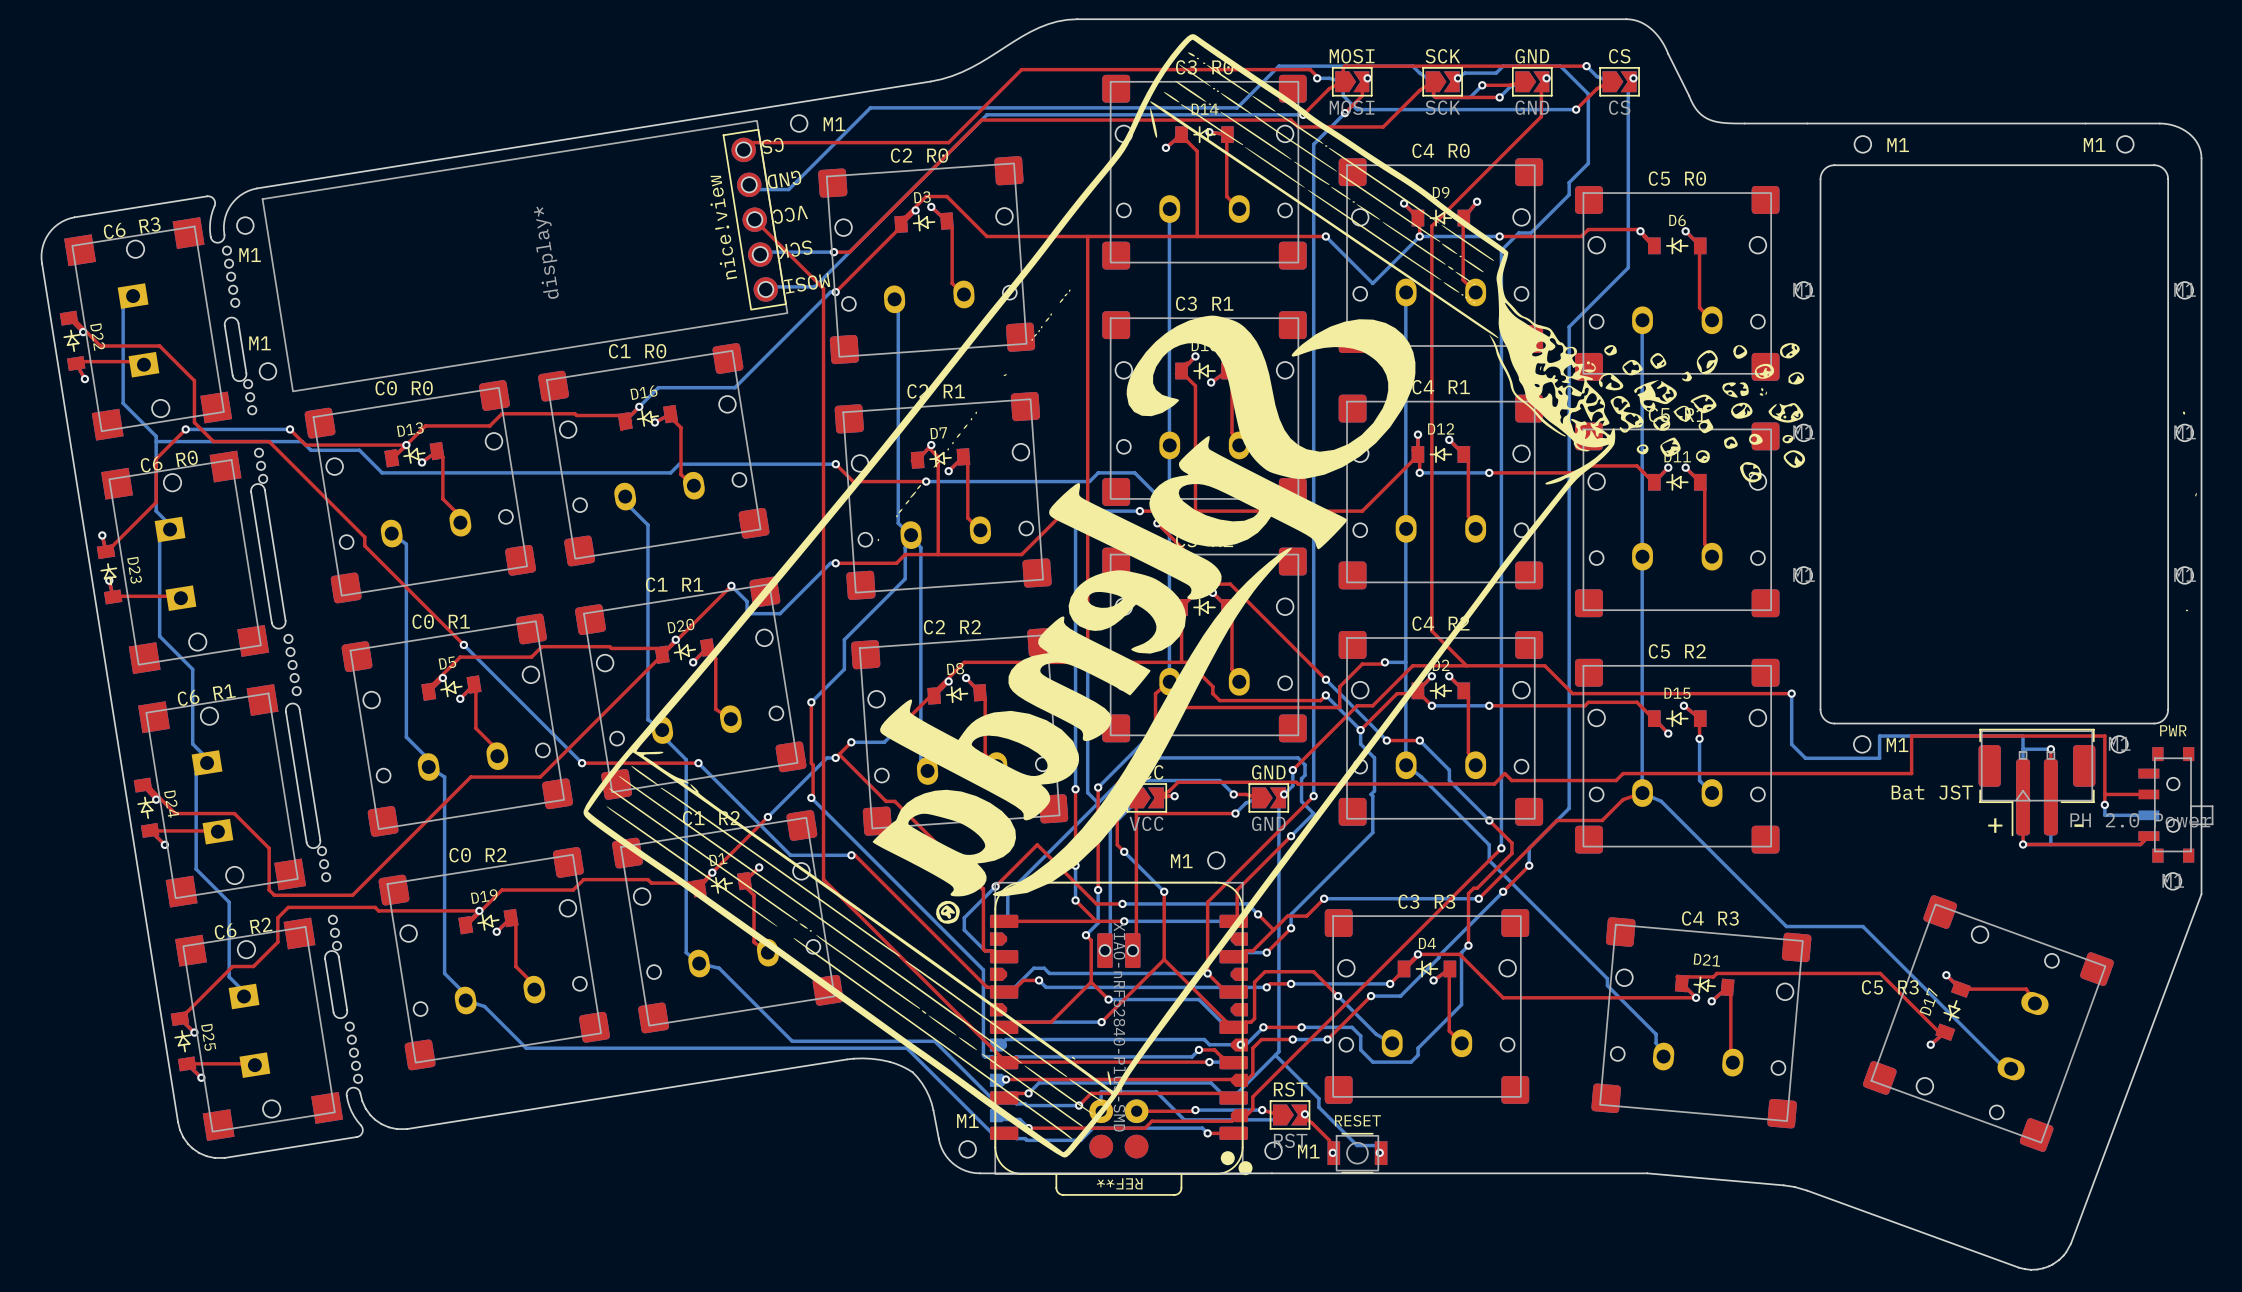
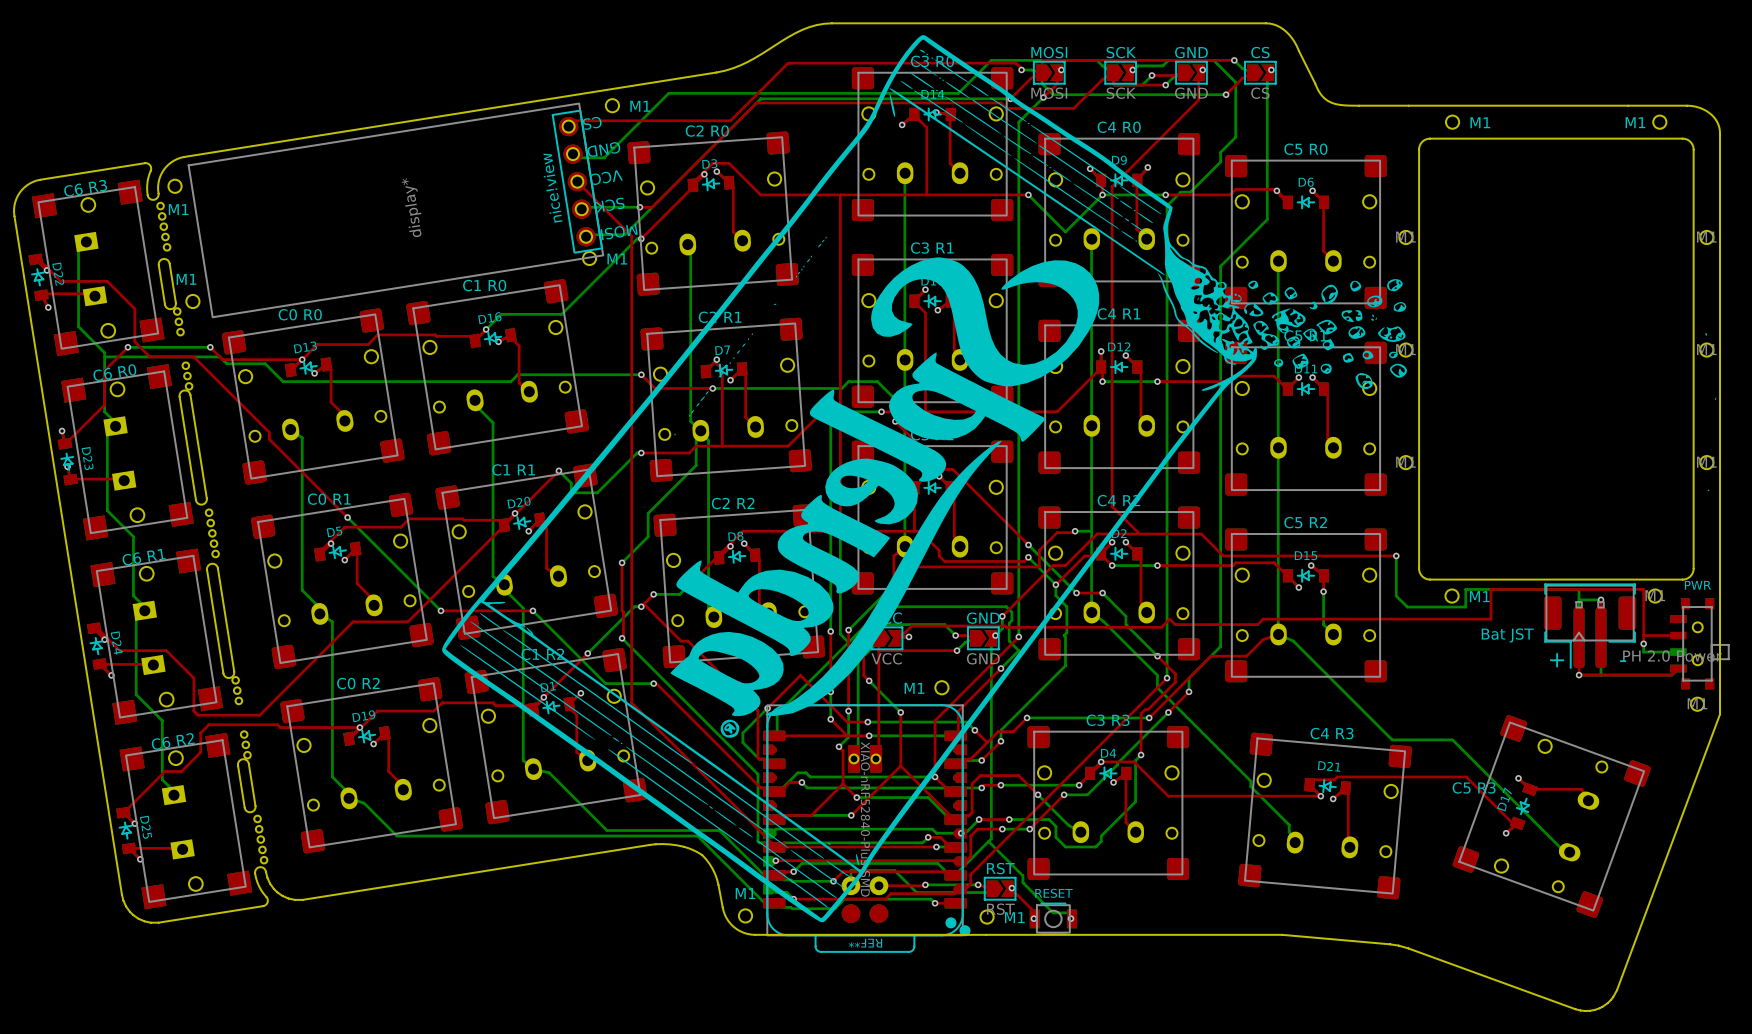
M1: none -> (589, 258)

